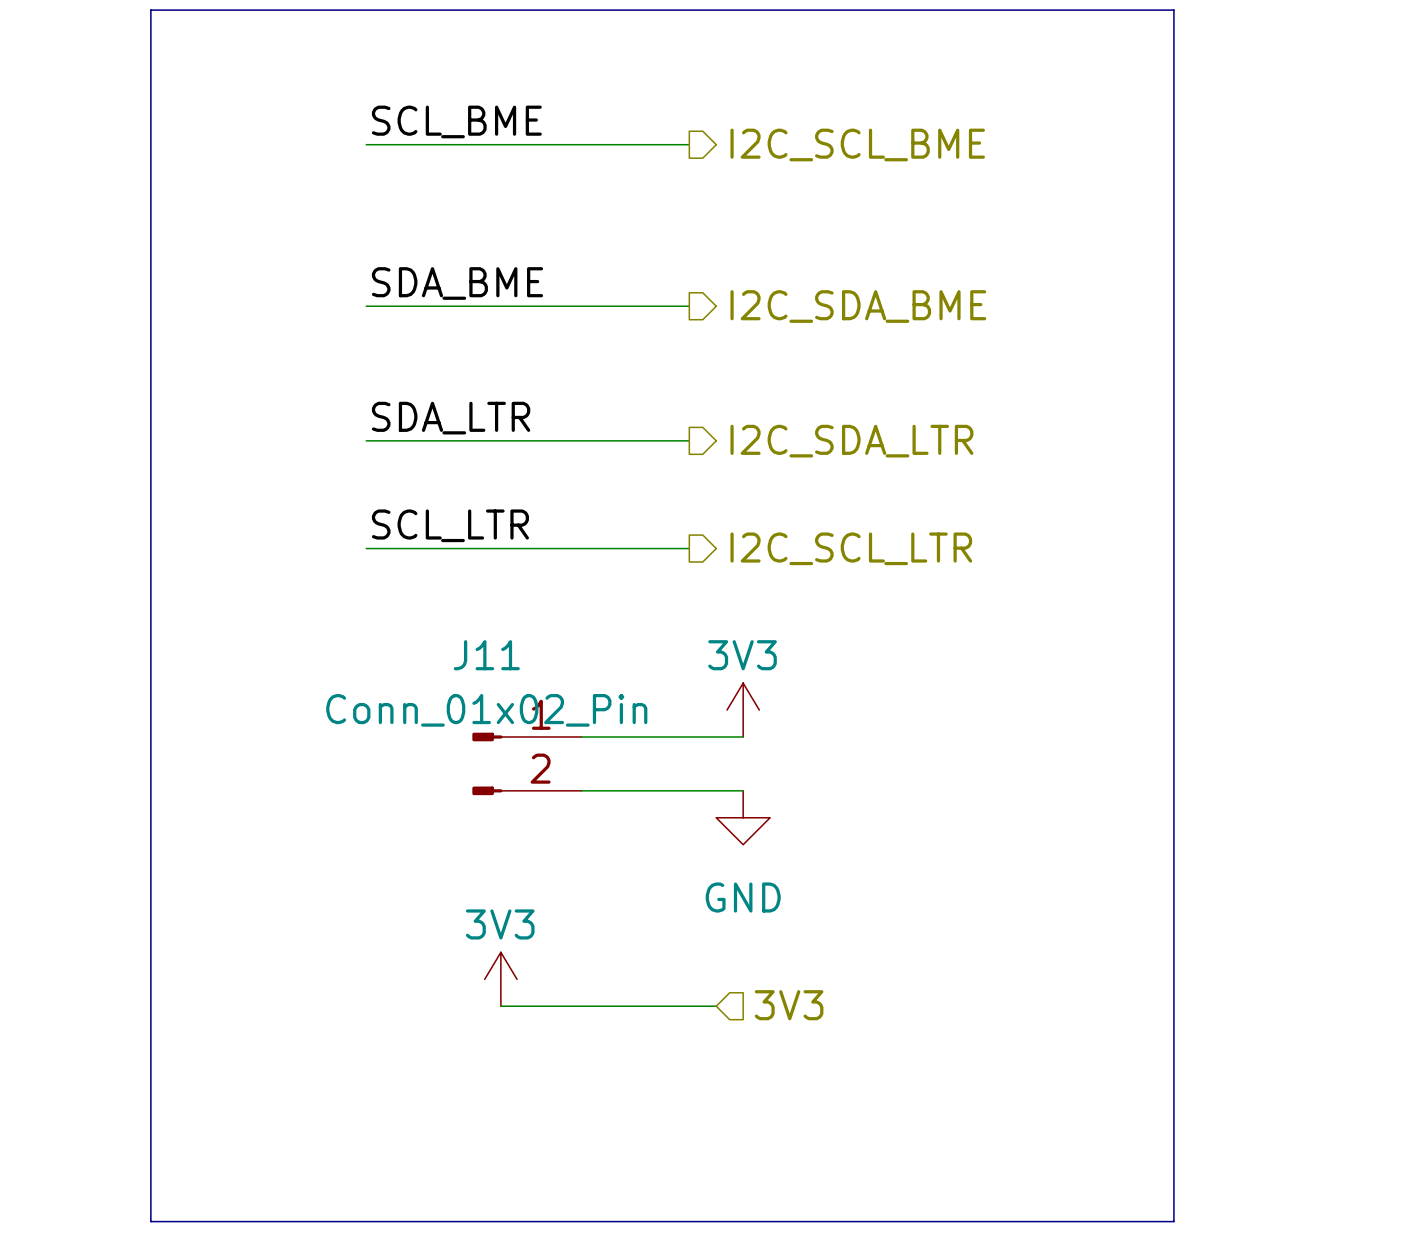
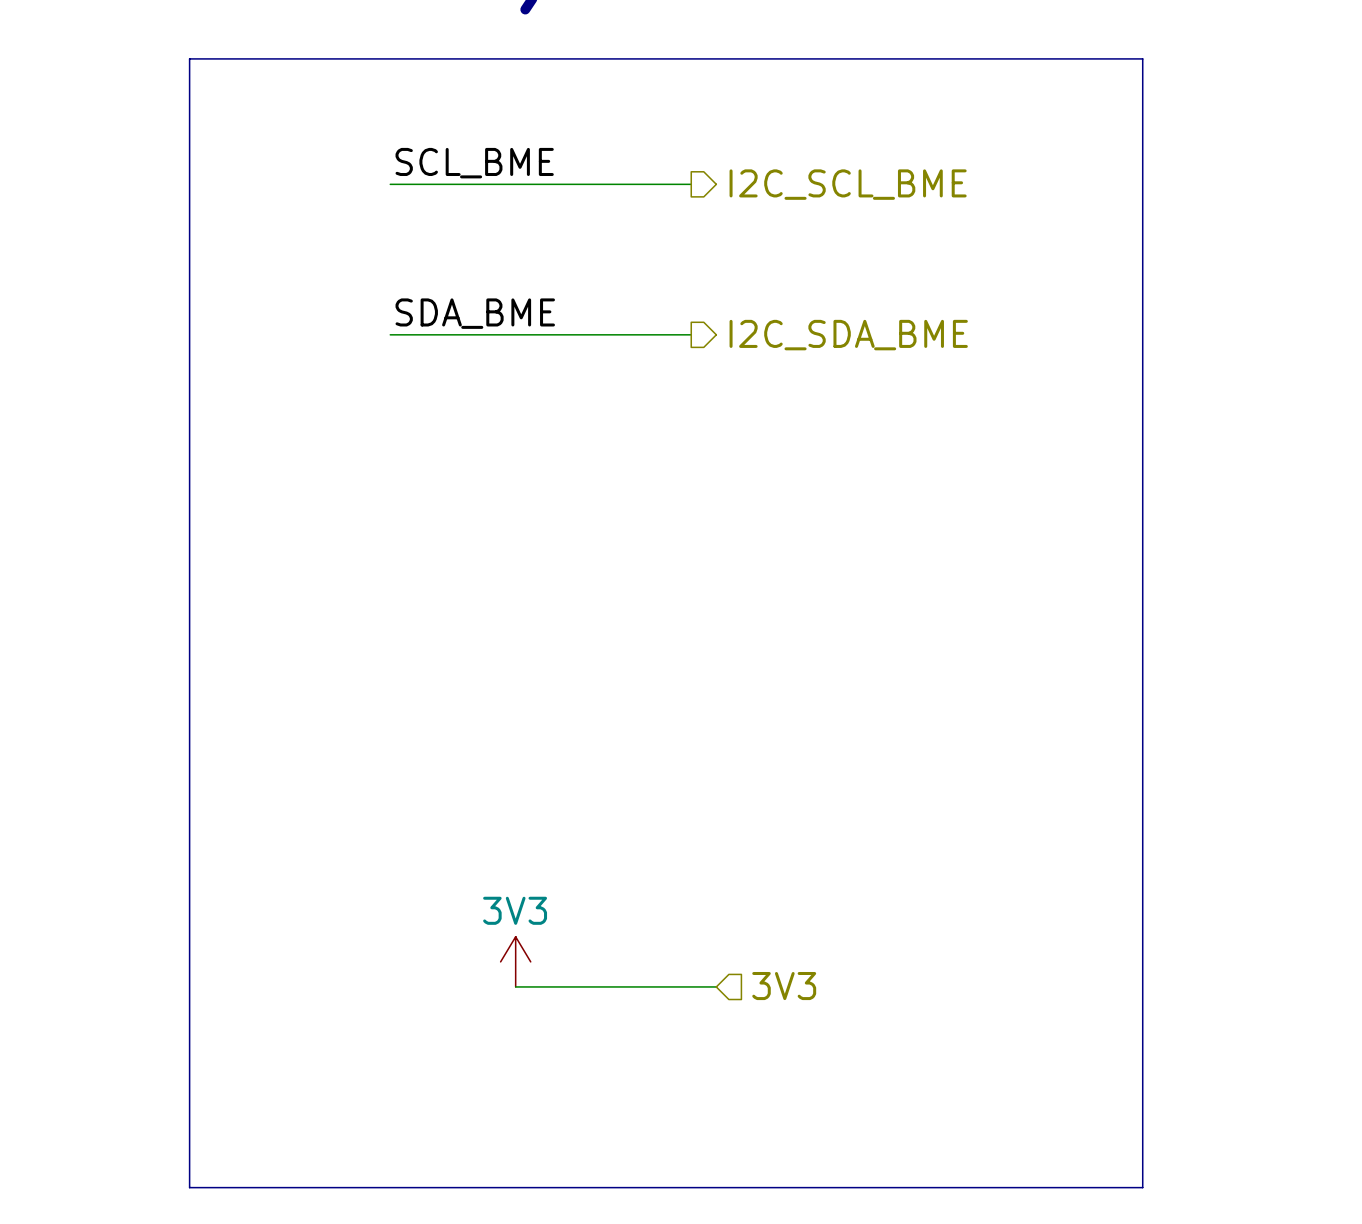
label: SDA_LTR (451, 418) -> none
wire: (366, 440) (689, 440) -> none
hierarchical label: I2C_SDA_LTR (851, 441) -> none
label: SCL_LTR (450, 525) -> none
wire: (366, 548) (689, 548) -> none
hierarchical label: I2C_SCL_LTR (851, 548) -> none
power symbol: 3V3 (743, 710) -> none
wire: (581, 736) (743, 736) -> none
J11: Conn_01x02_Pin (526, 763) -> none
wire: (581, 790) (743, 790) -> none
power symbol: GND (743, 817) -> none

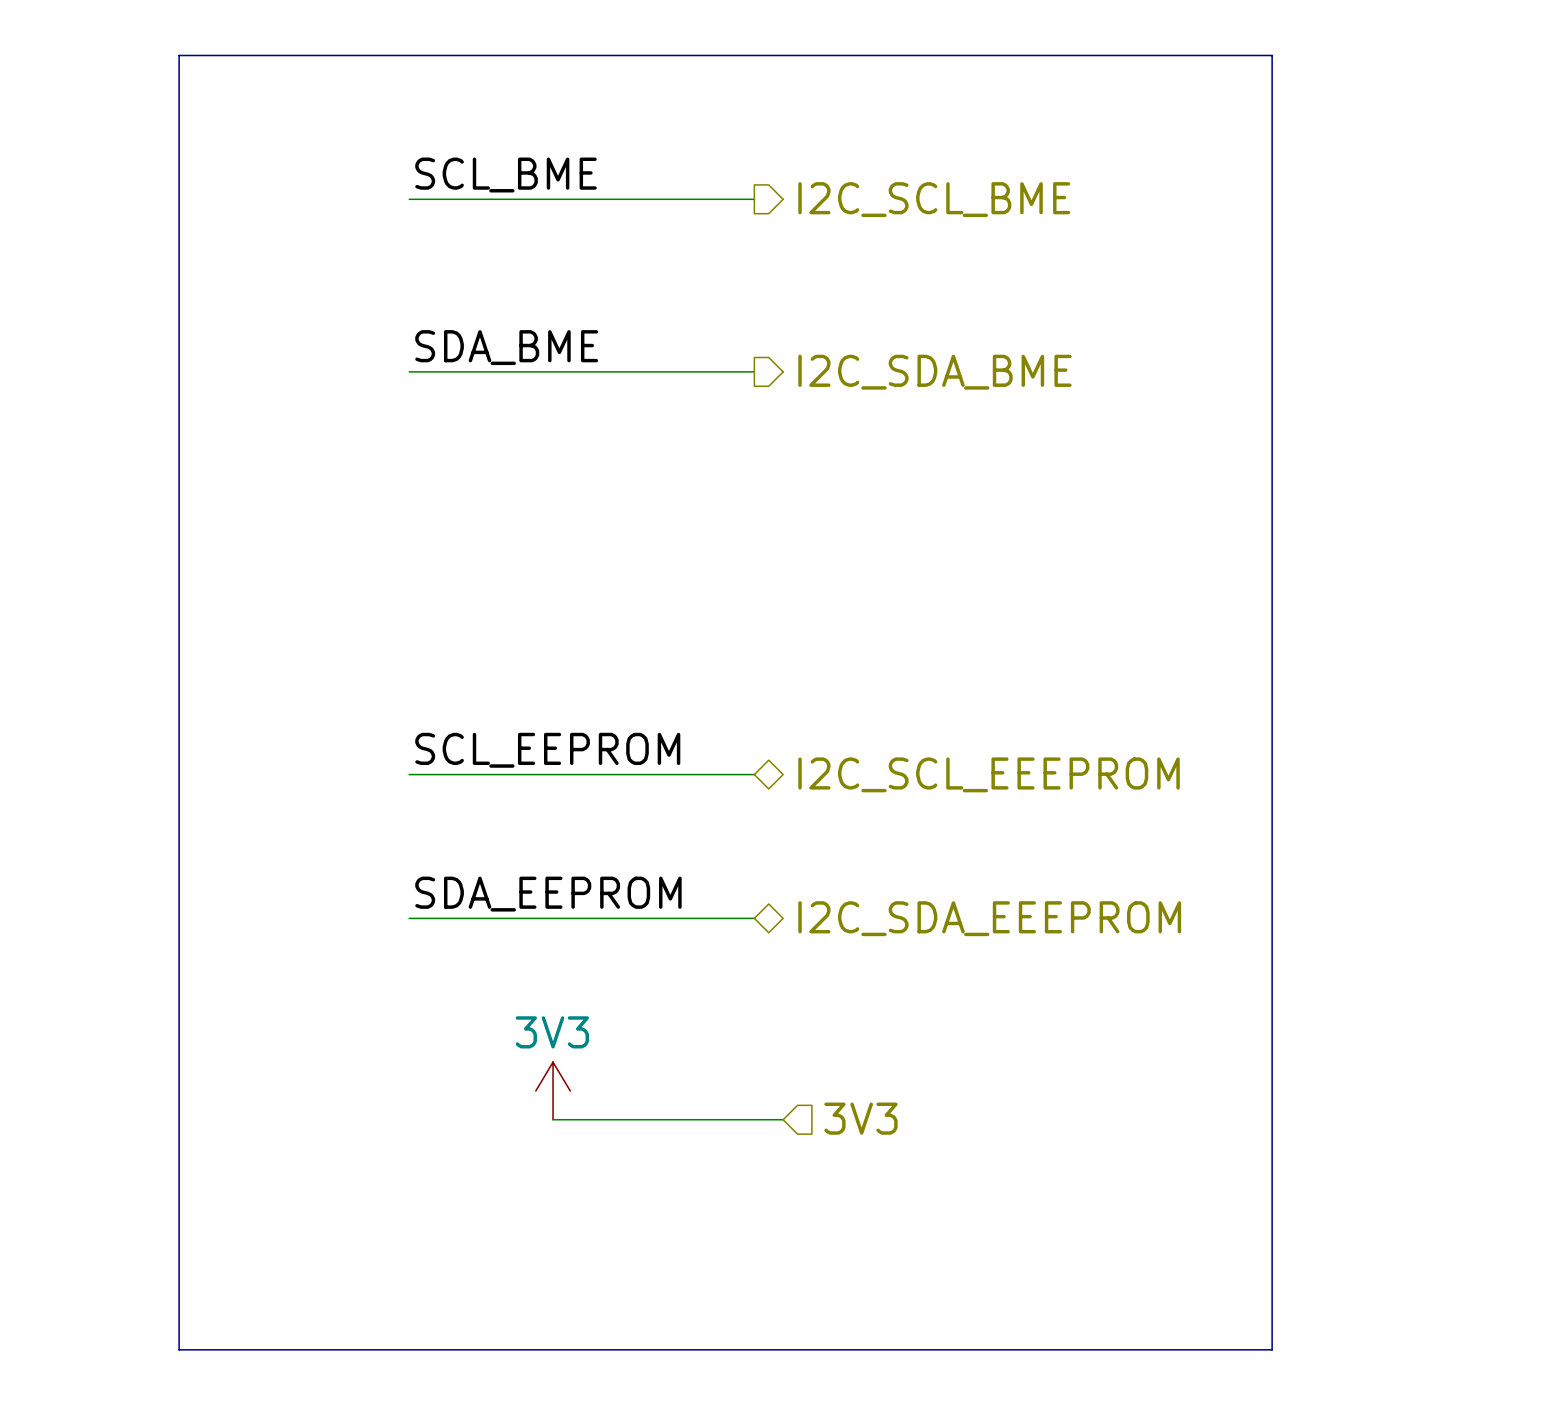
label: none -> SCL_EEPROM (547, 750)
wire: none -> (409, 774) (754, 774)
hierarchical label: none -> I2C_SCL_EEEPROM (989, 774)
label: none -> SDA_EEPROM (548, 894)
wire: none -> (409, 918) (754, 918)
hierarchical label: none -> I2C_SDA_EEEPROM (989, 918)

